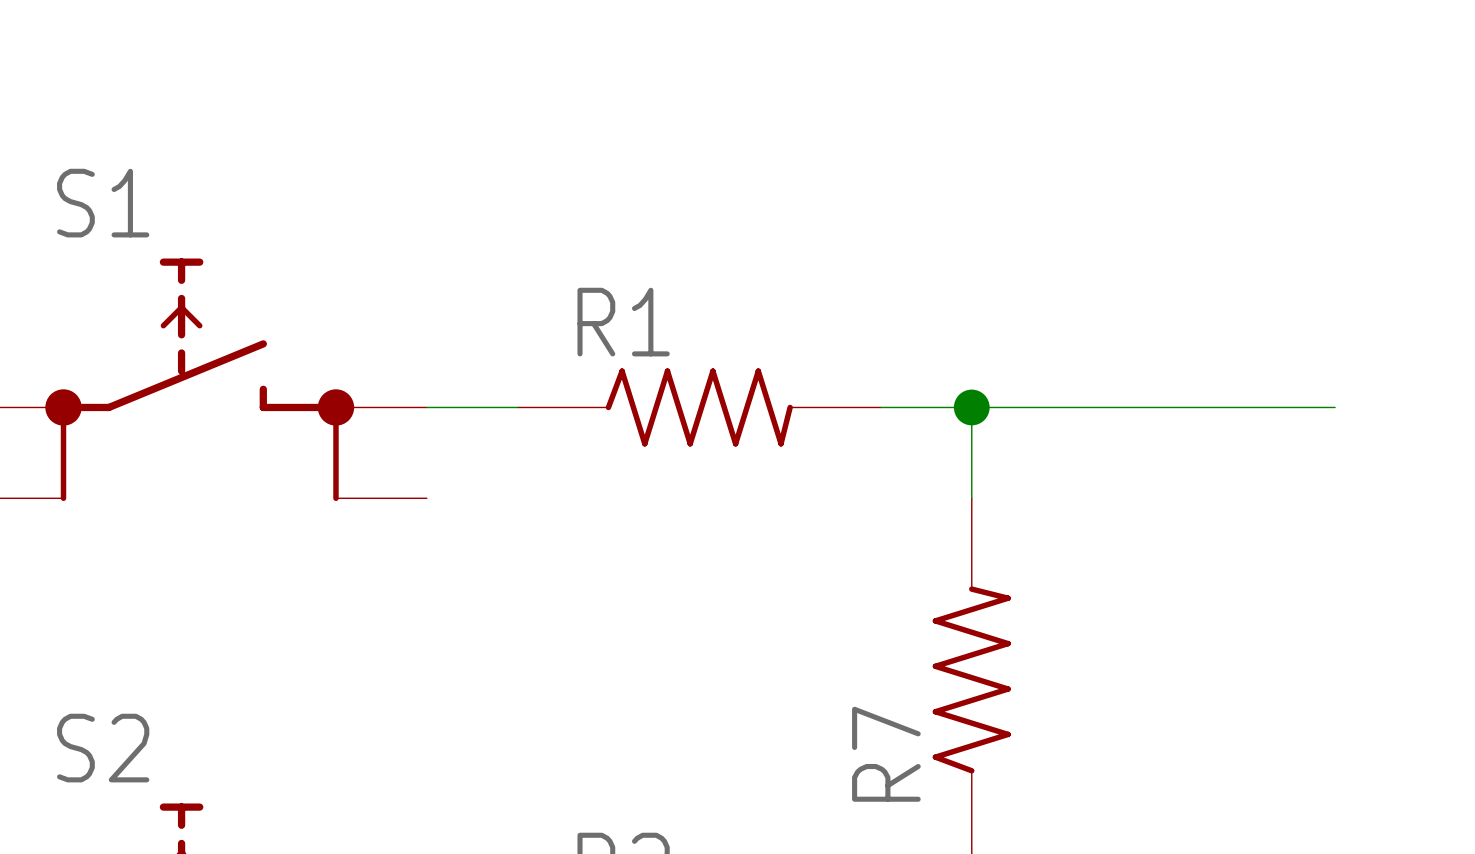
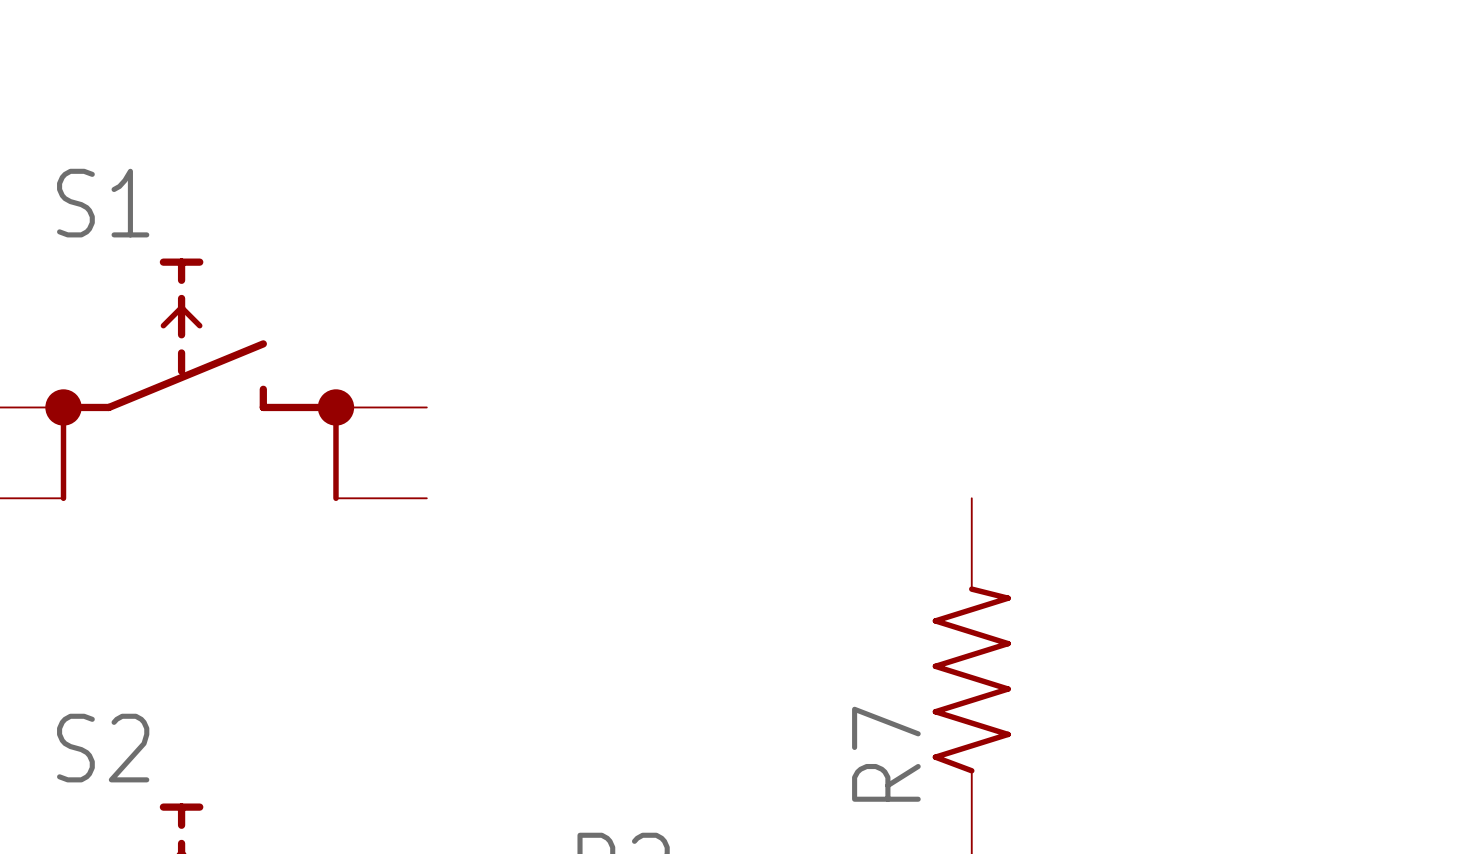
wire: (426, 407) (517, 407) -> none
R1: (699, 407) -> none
wire: (880, 407) (1335, 407) -> none
wire: (971, 407) (971, 498) -> none
junction: (971, 407) -> none

